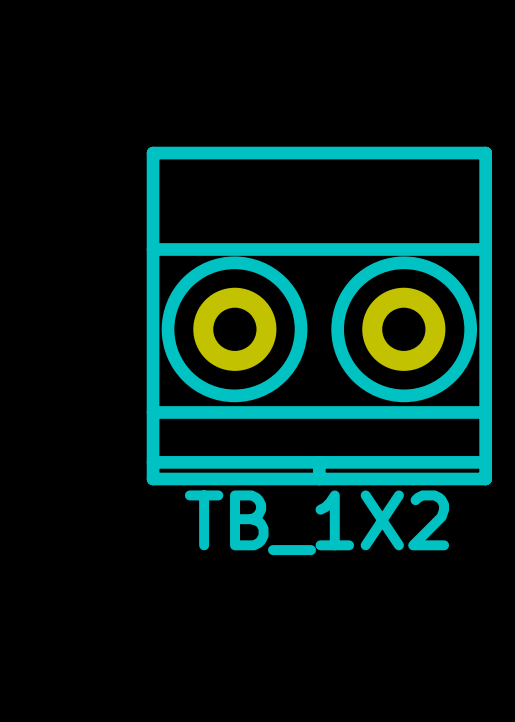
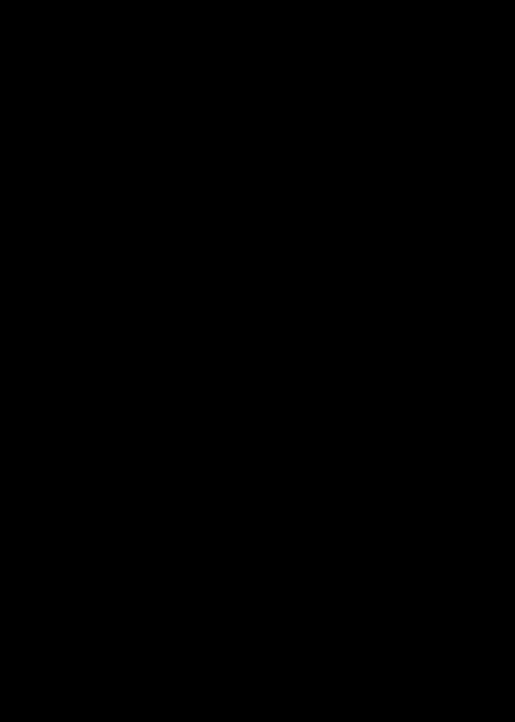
part: TB_1X2 (319, 316) -> none

